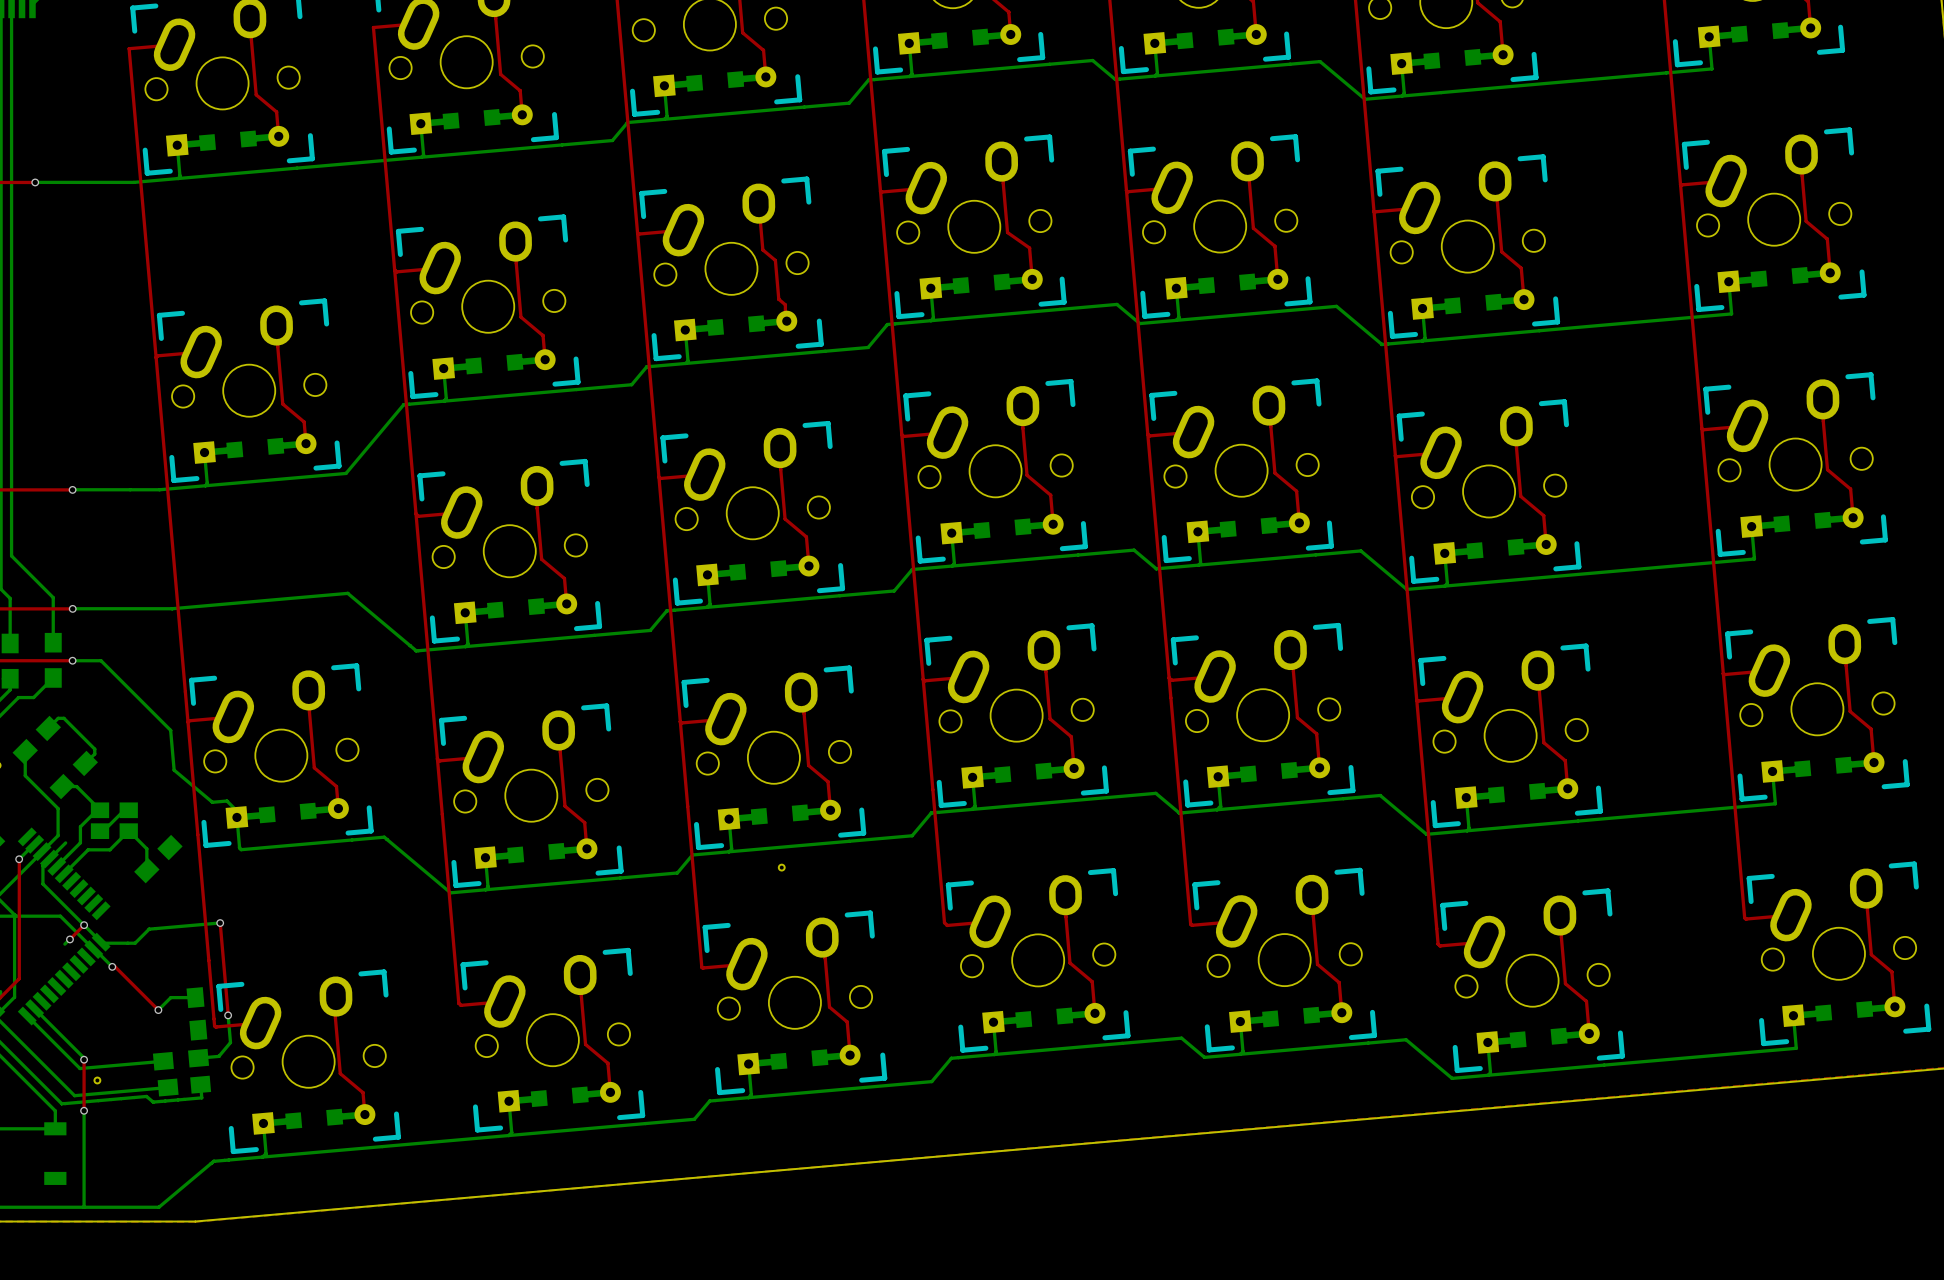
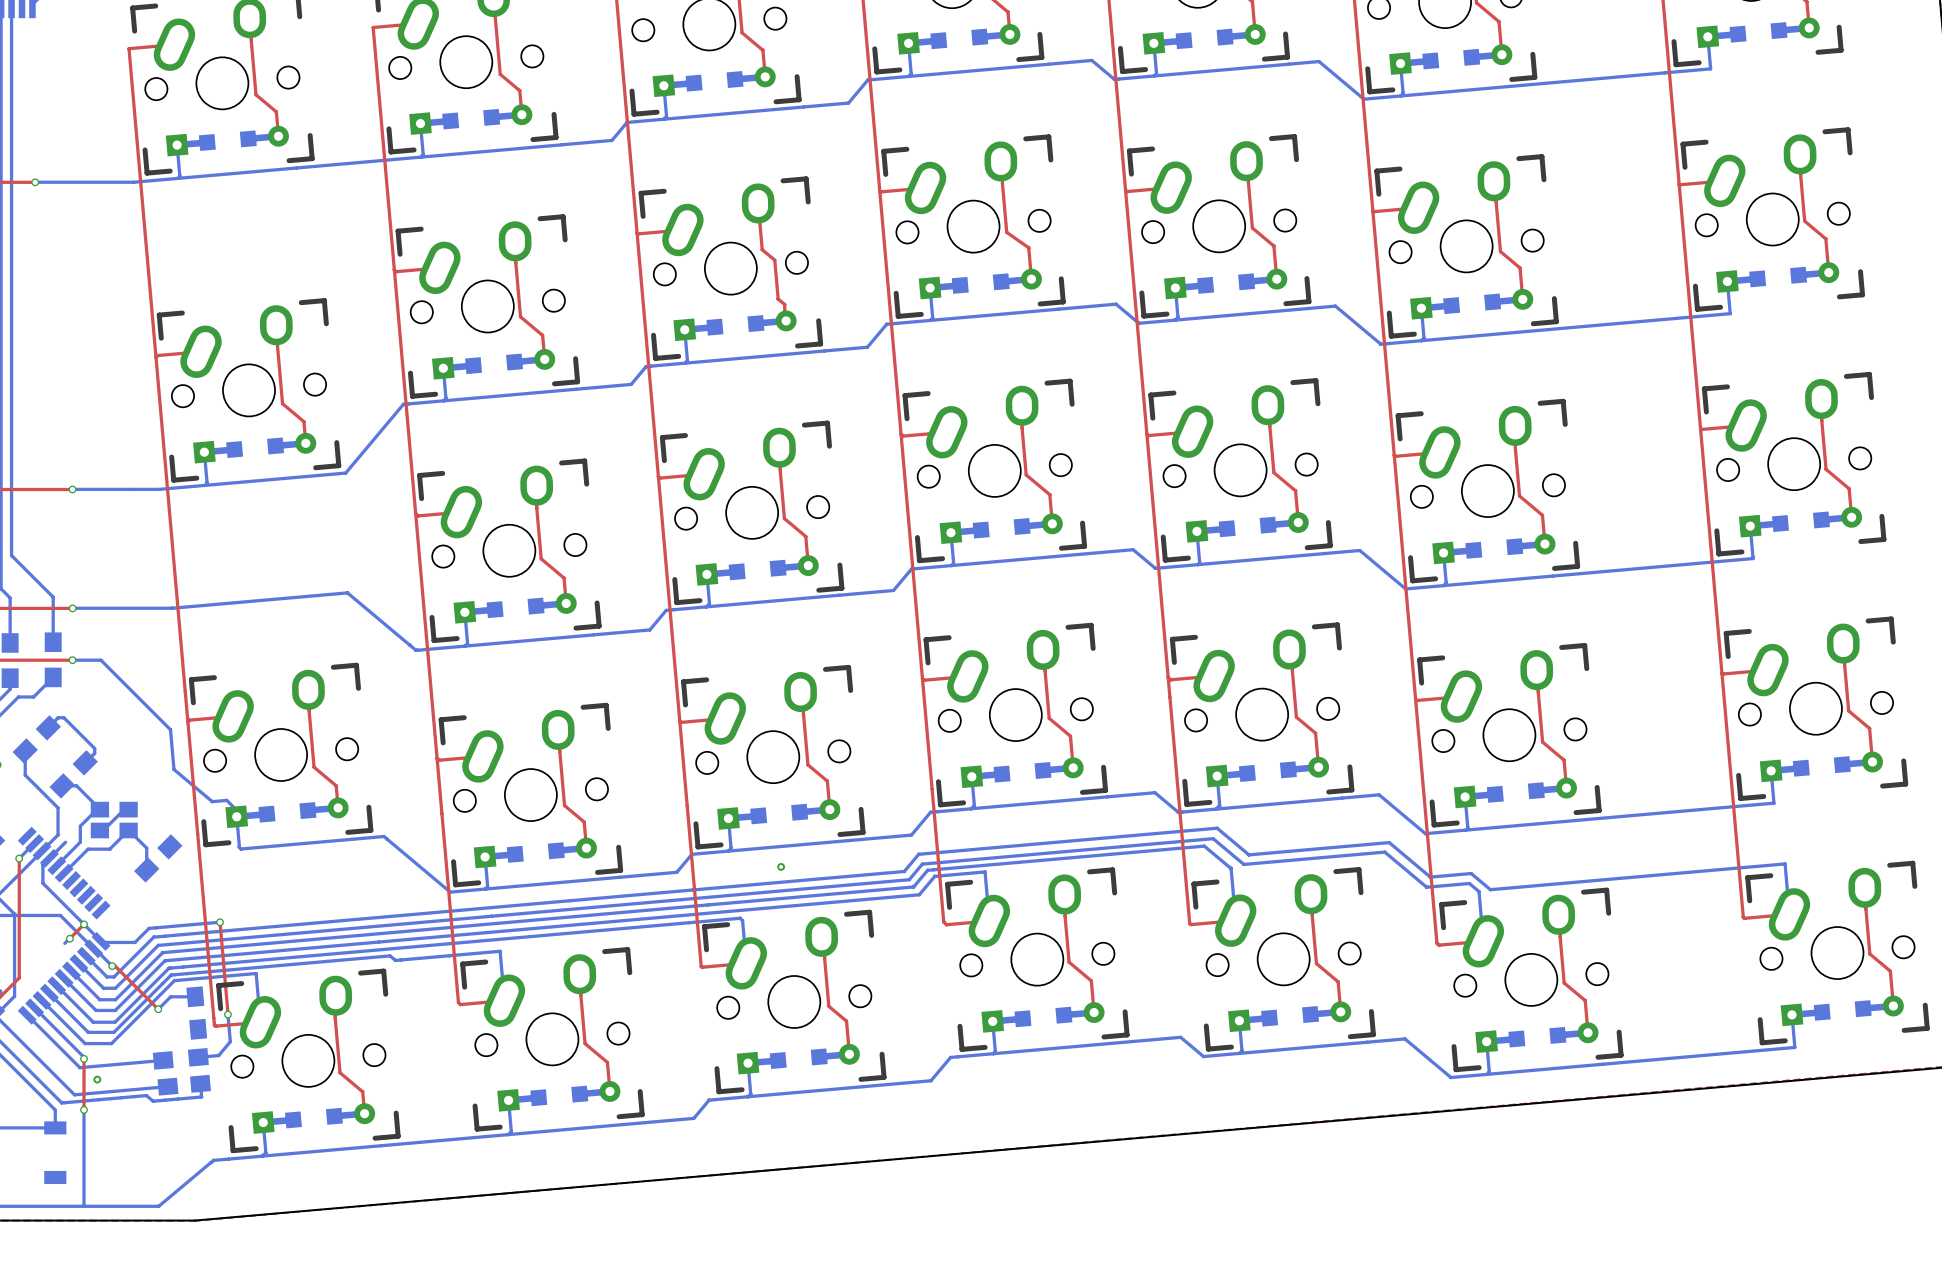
bottom track: none -> (1248, 854) (1217, 828) (918, 854) (904, 871) (153, 937) (114, 976) (107, 976) (86, 956)
bottom track: none -> (1248, 854) (1389, 842) (1430, 877) (1471, 873) (1490, 889)
bottom track: none -> (922, 864) (909, 879) (158, 945) (115, 988) (103, 988) (78, 963)
bottom track: none -> (922, 864) (1213, 838) (1243, 864)
bottom track: none -> (1244, 864) (1384, 852) (1426, 887)
bottom track: none -> (1426, 887) (1469, 883) (1479, 891)
bottom track: none -> (1490, 889) (1785, 863) (1789, 914)
bottom track: none -> (1479, 891) (1483, 941)
bottom track: none -> (989, 920) (985, 871) (934, 876) (919, 894) (165, 960) (115, 1010) (96, 1010) (64, 978)
bottom track: none -> (1235, 920) (1231, 868) (1204, 846) (927, 870) (913, 886) (162, 952)
bottom track: none -> (162, 952) (115, 999) (99, 999) (71, 971)
bottom track: none -> (746, 963) (742, 920) (740, 918) (169, 968) (115, 1021)
bottom track: none -> (56, 985) (93, 1022) (115, 1022)
bottom track: none -> (49, 993) (88, 1032) (113, 1032) (171, 975) (390, 955) (395, 960) (500, 951) (504, 1000)
bottom track: none -> (42, 1000) (85, 1043) (111, 1043) (174, 980) (256, 973) (260, 1022)

